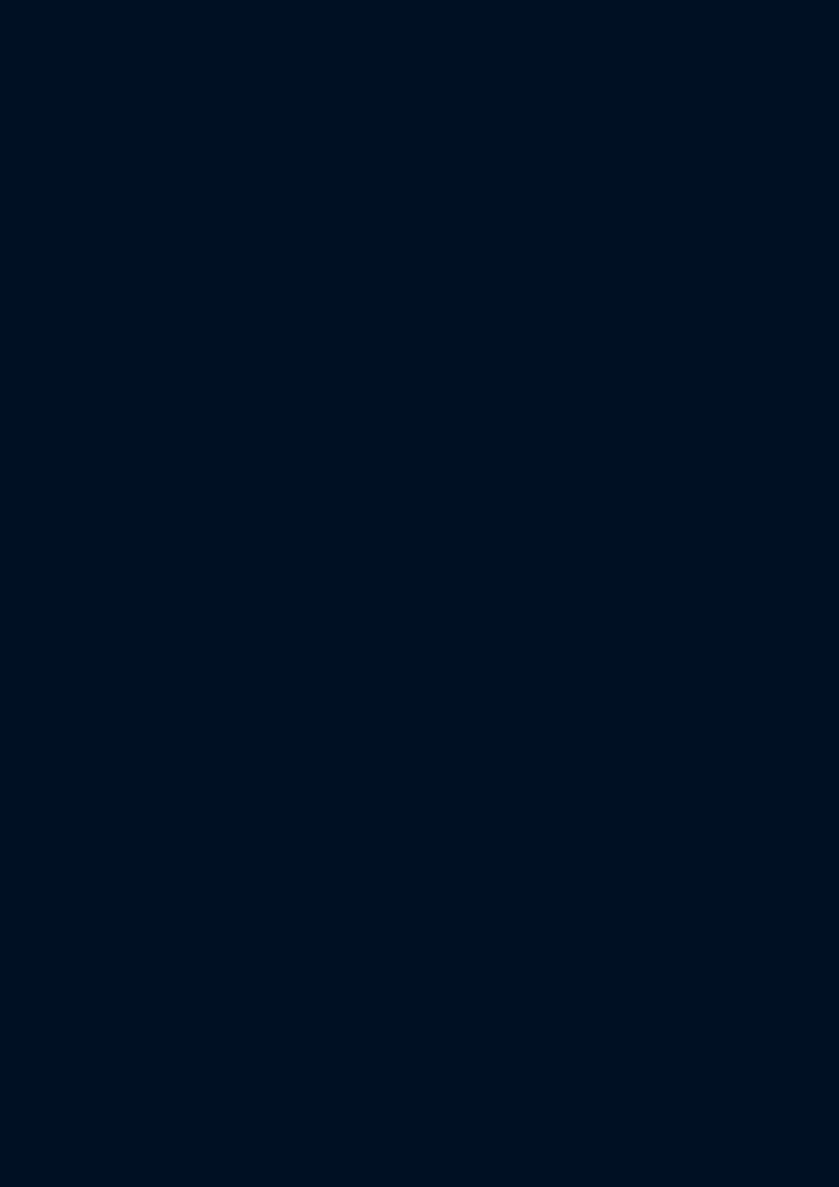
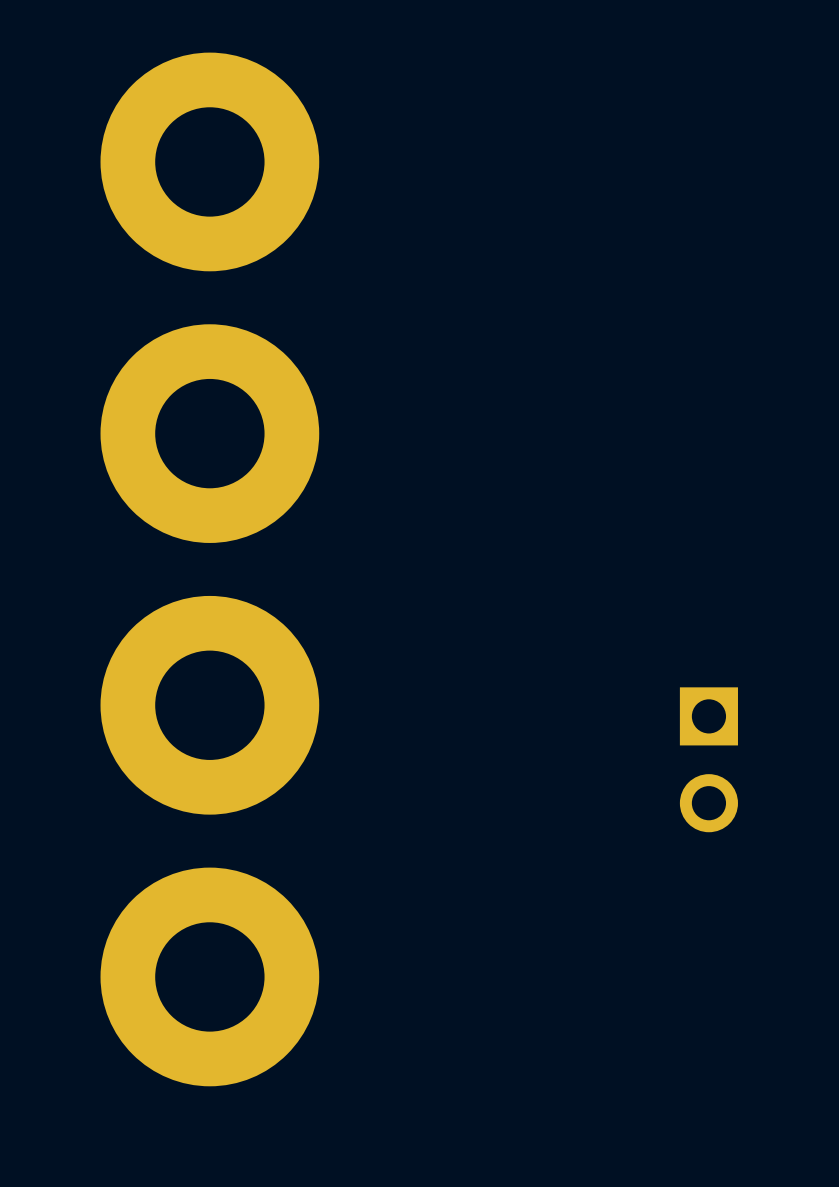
part: none -> (209, 161)
part: none -> (209, 433)
part: none -> (209, 705)
part: none -> (708, 759)
part: none -> (209, 976)

